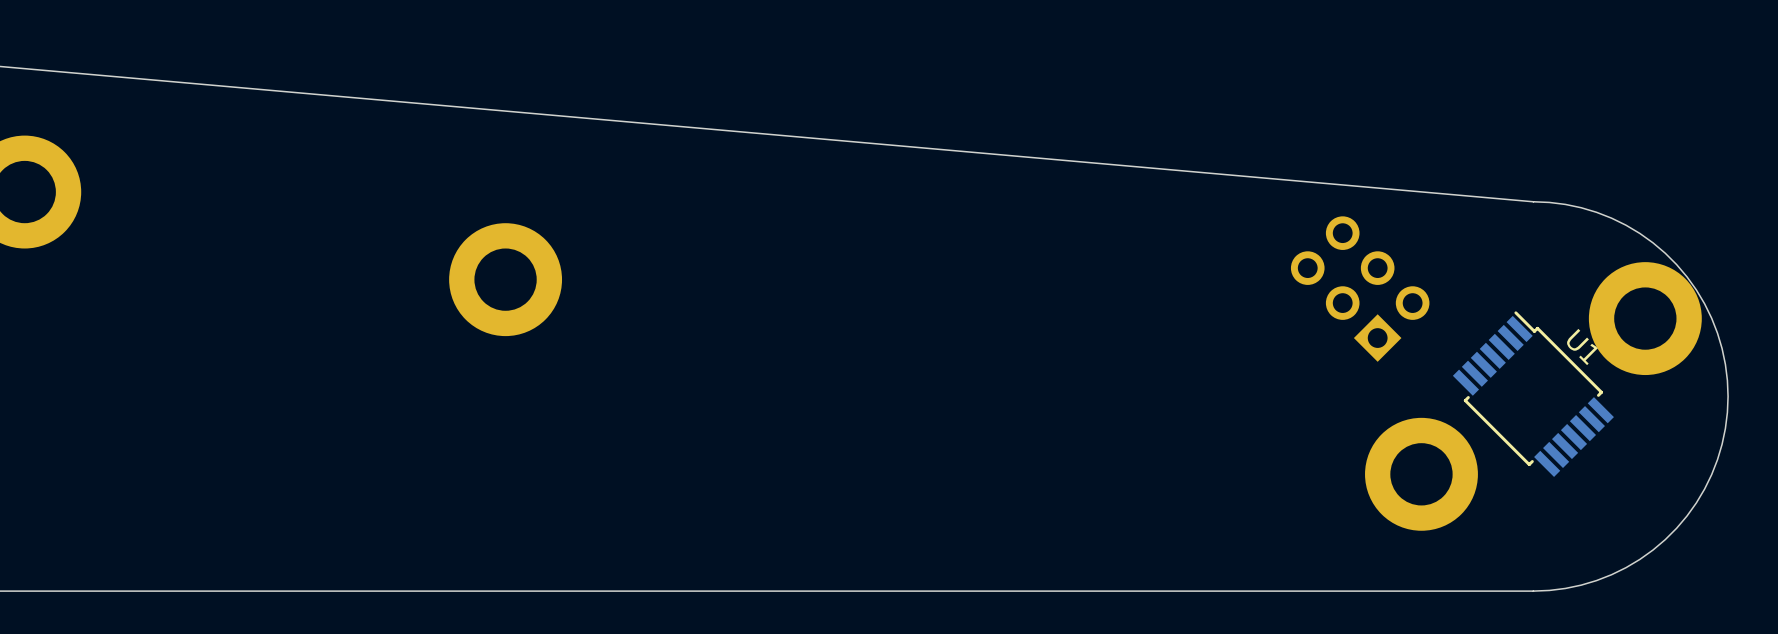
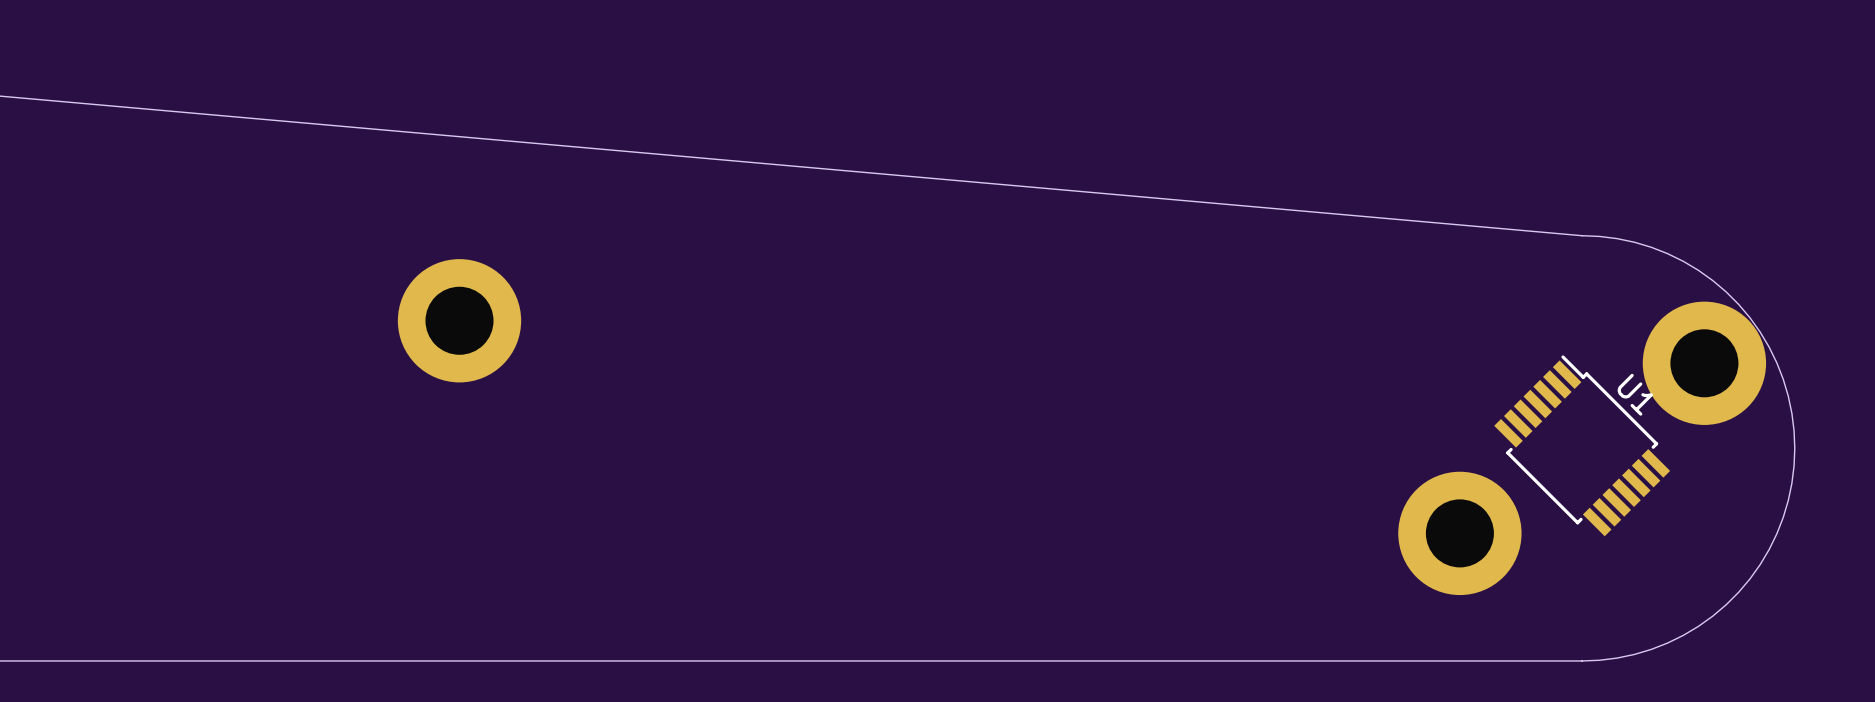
part: (1360, 289) -> none

